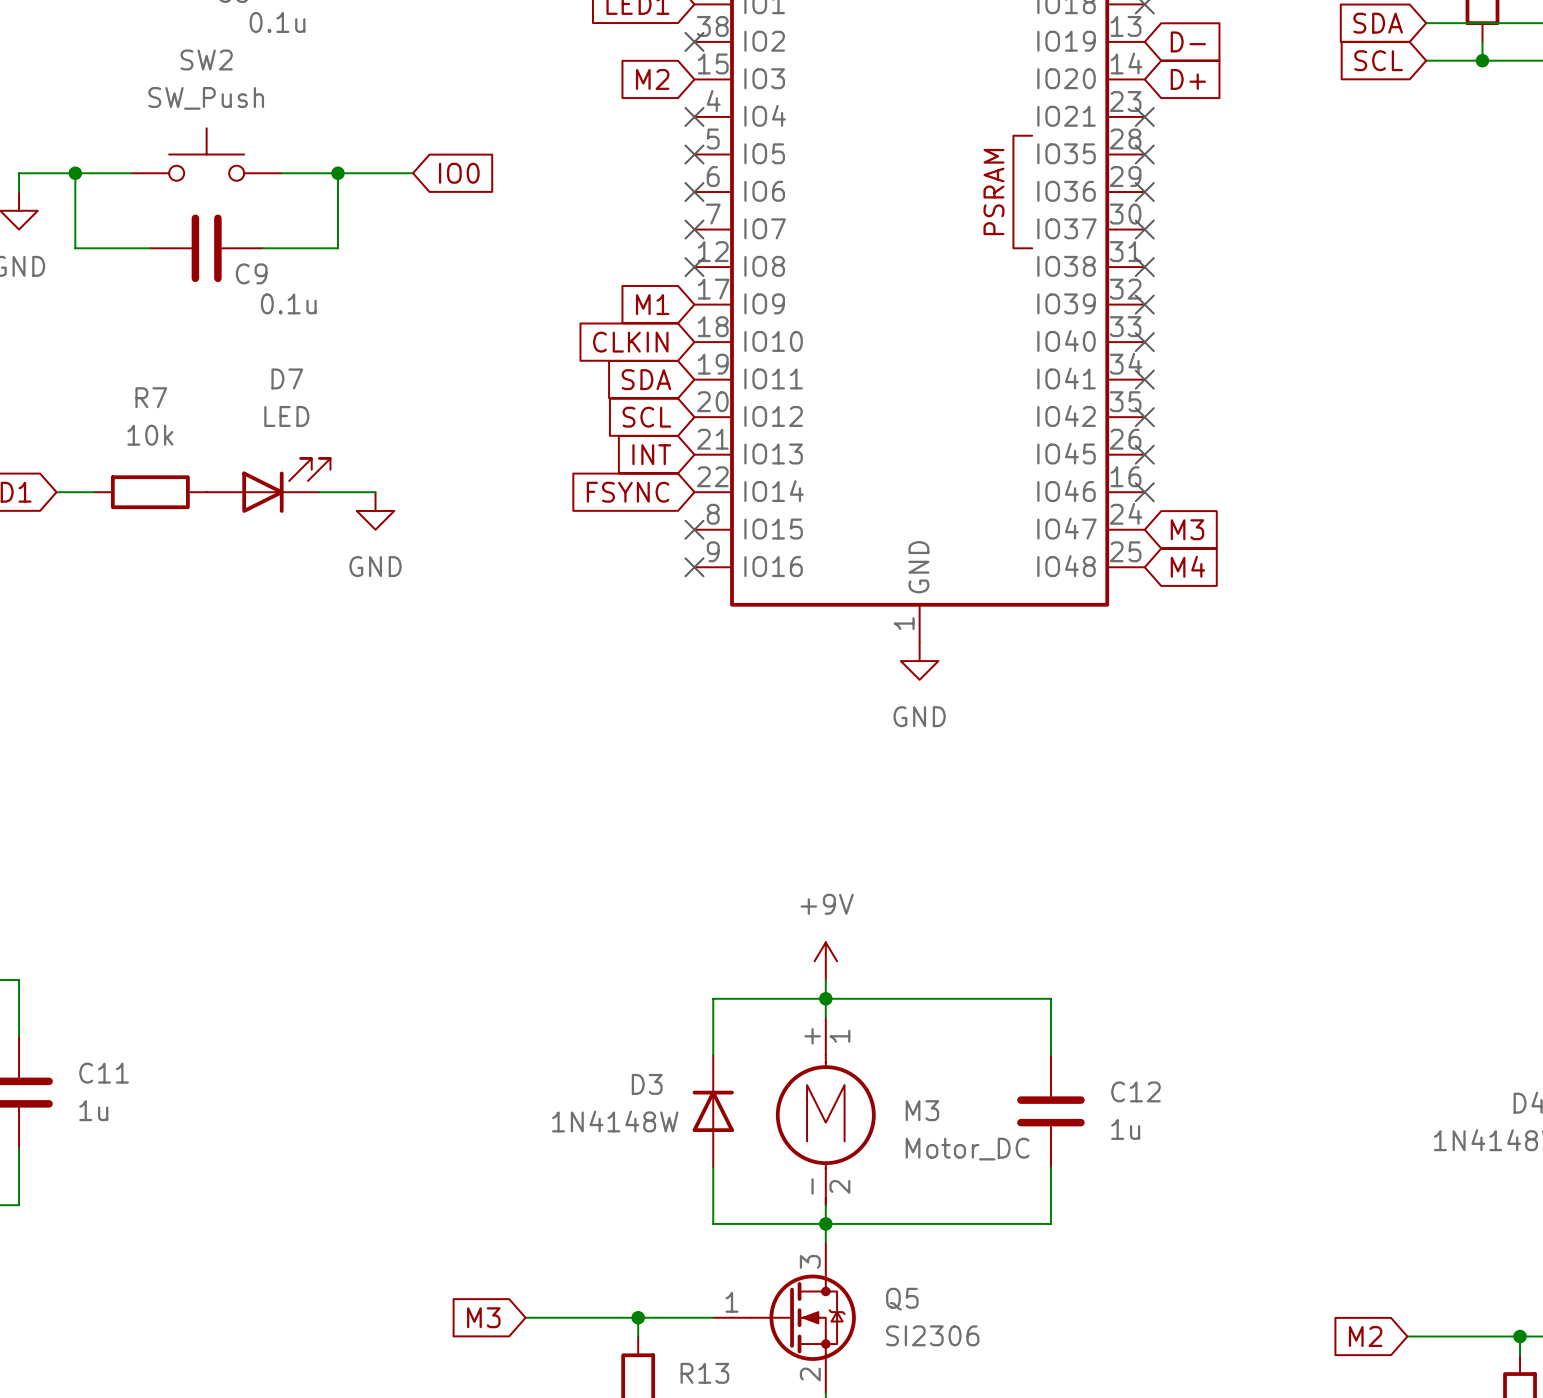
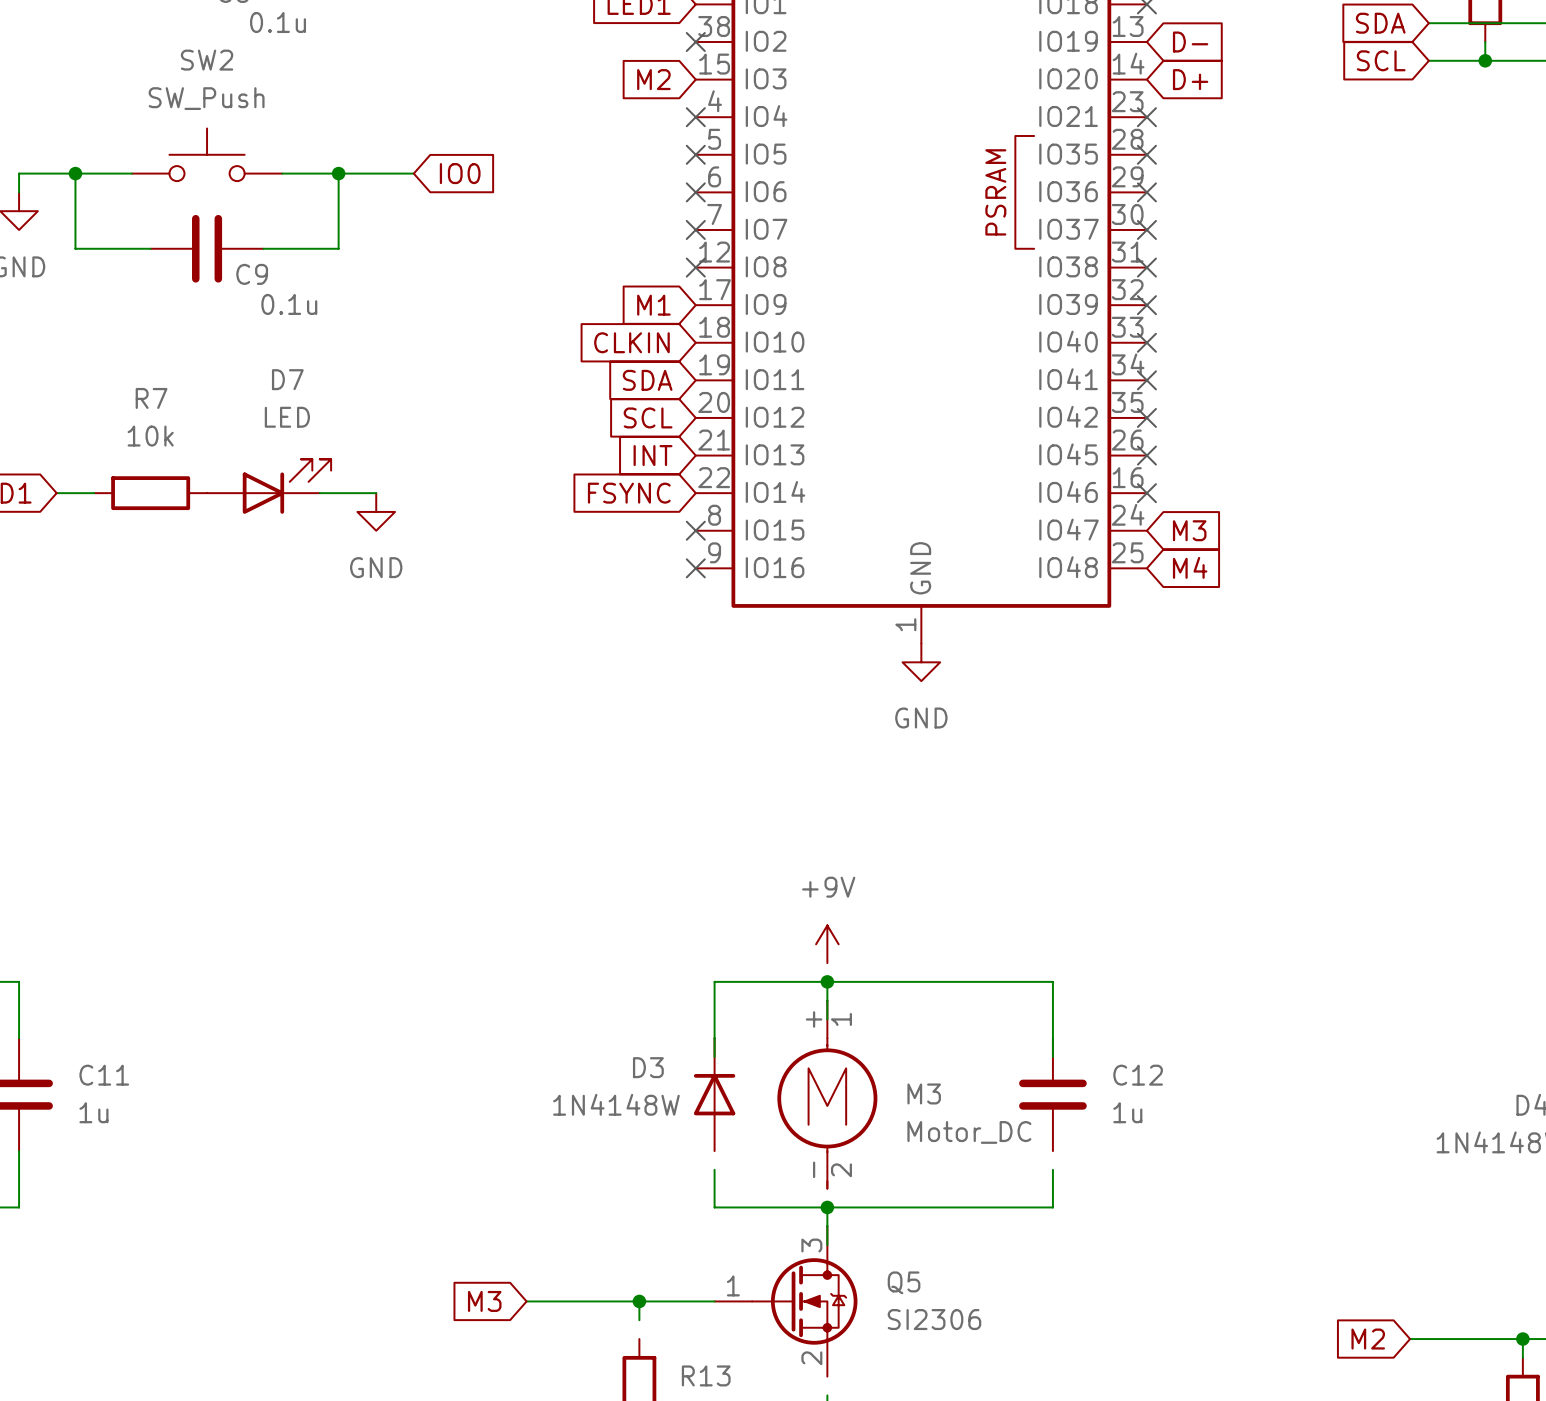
power symbol position: +9V (825, 961) -> +9V (827, 944)
wire: (713, 998) (1050, 998) -> (714, 1000) (714, 981) (1052, 981) (1052, 1000)
junction position: (825, 998) -> (827, 981)
D3 position: (713, 1111) -> (714, 1094)
M3 position: (825, 1111) -> (827, 1094)
C12 position: (1050, 1111) -> (1052, 1094)
wire: (713, 1205) (713, 1223) (1050, 1223) (1050, 1205) -> (714, 1207) (1052, 1207)
junction position: (825, 1223) -> (827, 1207)
global label position: M3 (483, 1317) -> M3 (484, 1301)
wire: (525, 1317) (713, 1317) -> (526, 1301) (714, 1301)
wire: (638, 1317) (638, 1336) -> (639, 1320) (639, 1301)
junction position: (638, 1317) -> (639, 1301)
Q5 position: (784, 1317) -> (786, 1301)

